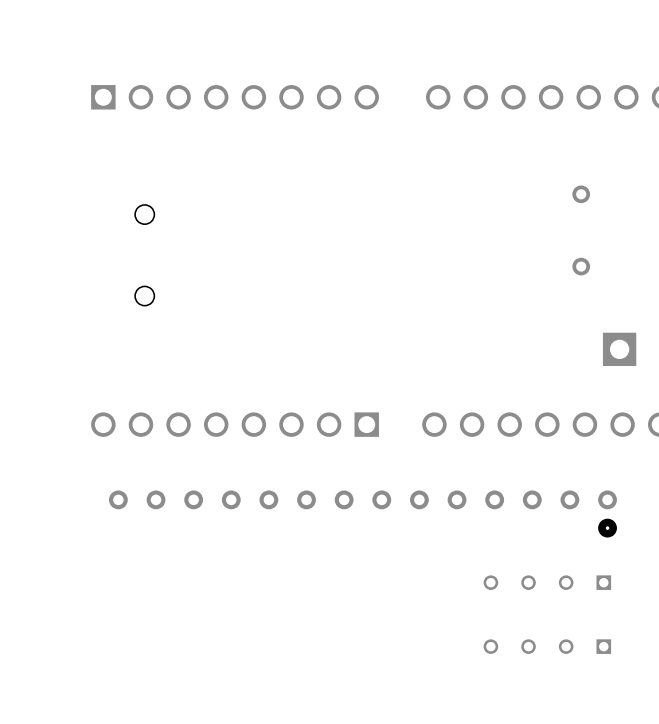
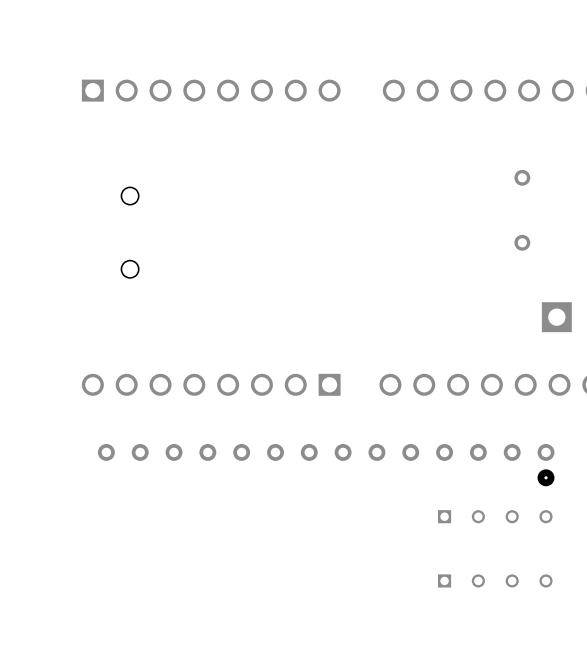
part rotation: 0° (547, 582) -> 180° (495, 516)
part rotation: 0° (547, 646) -> 180° (495, 580)

